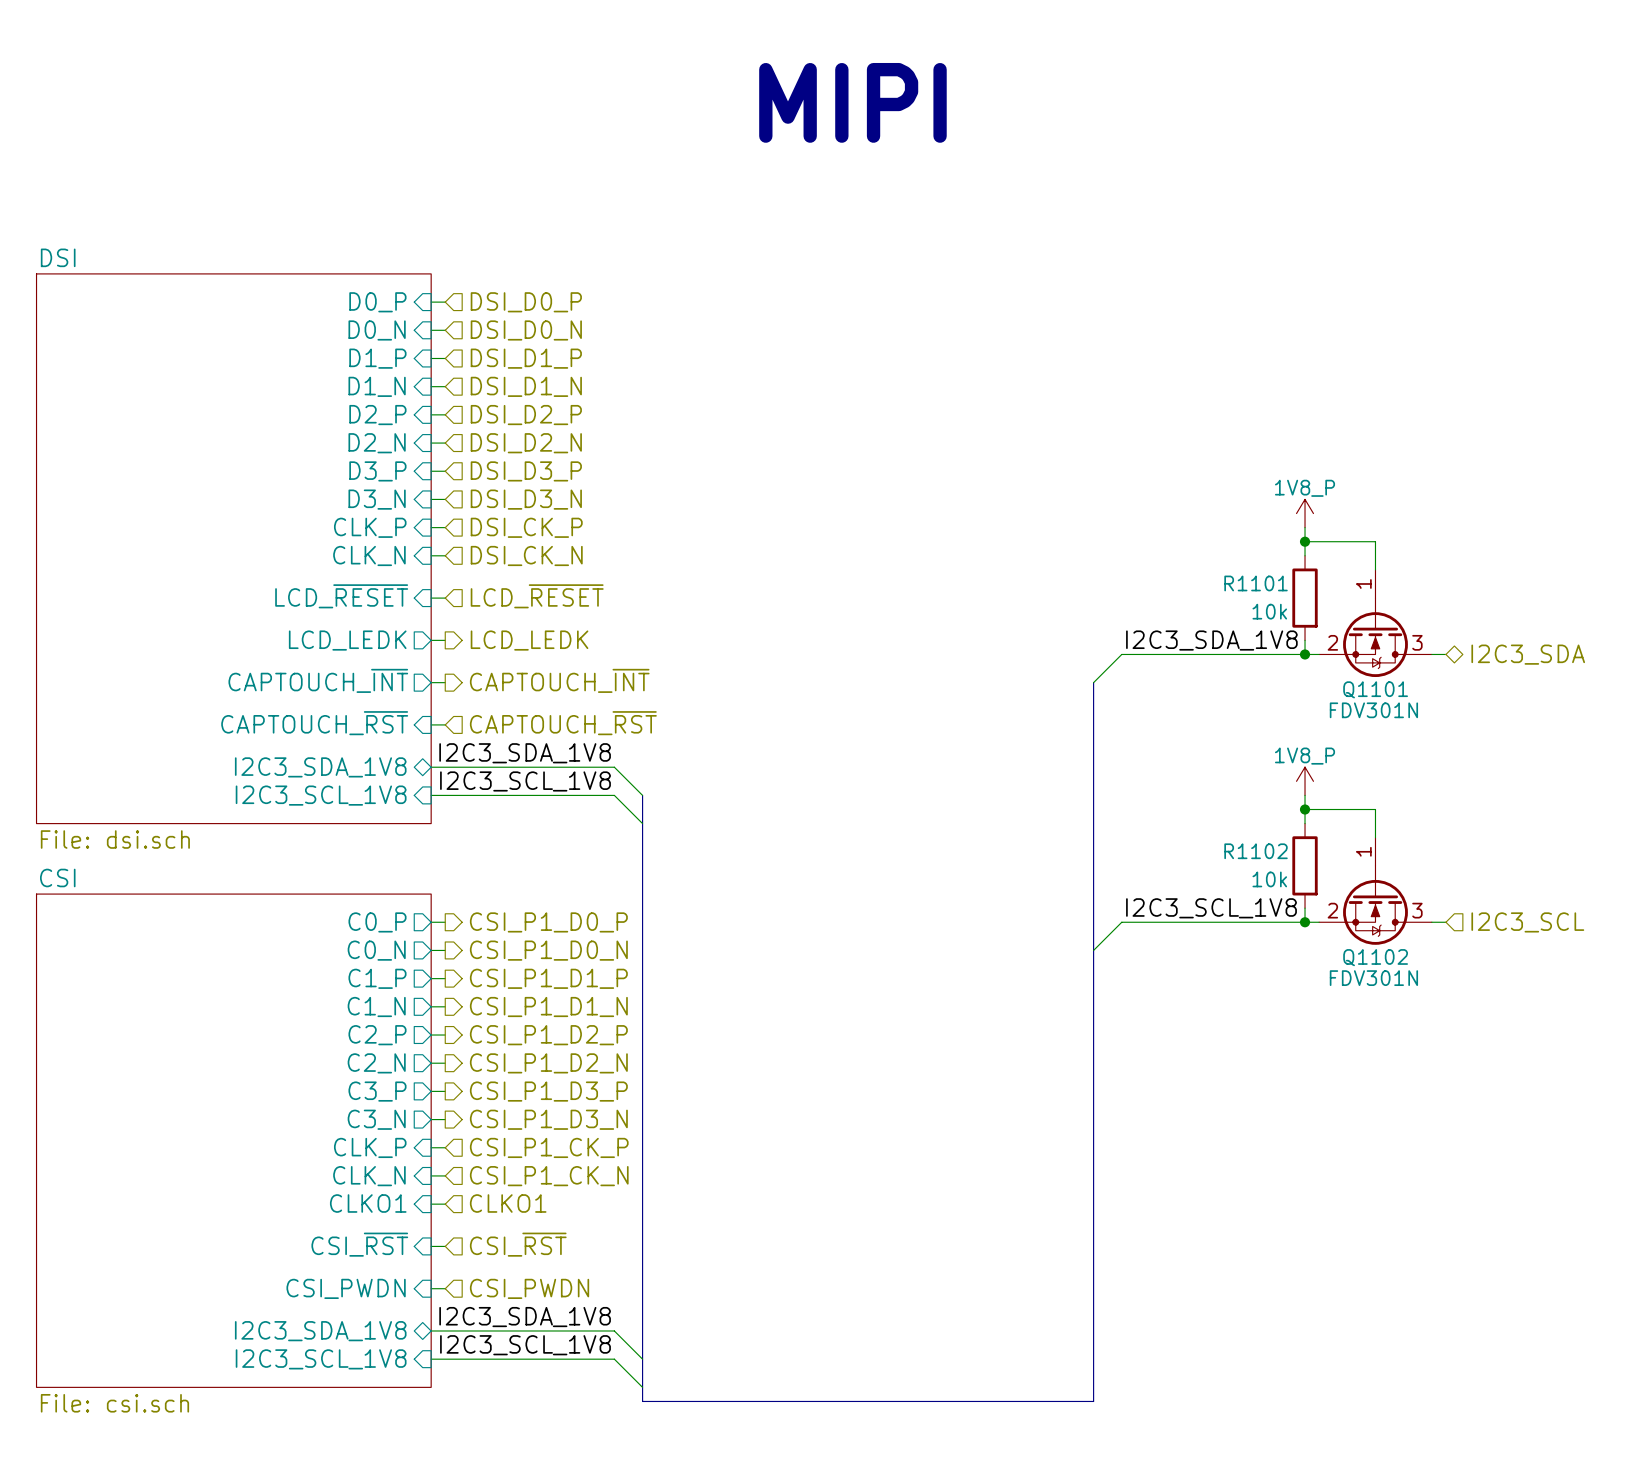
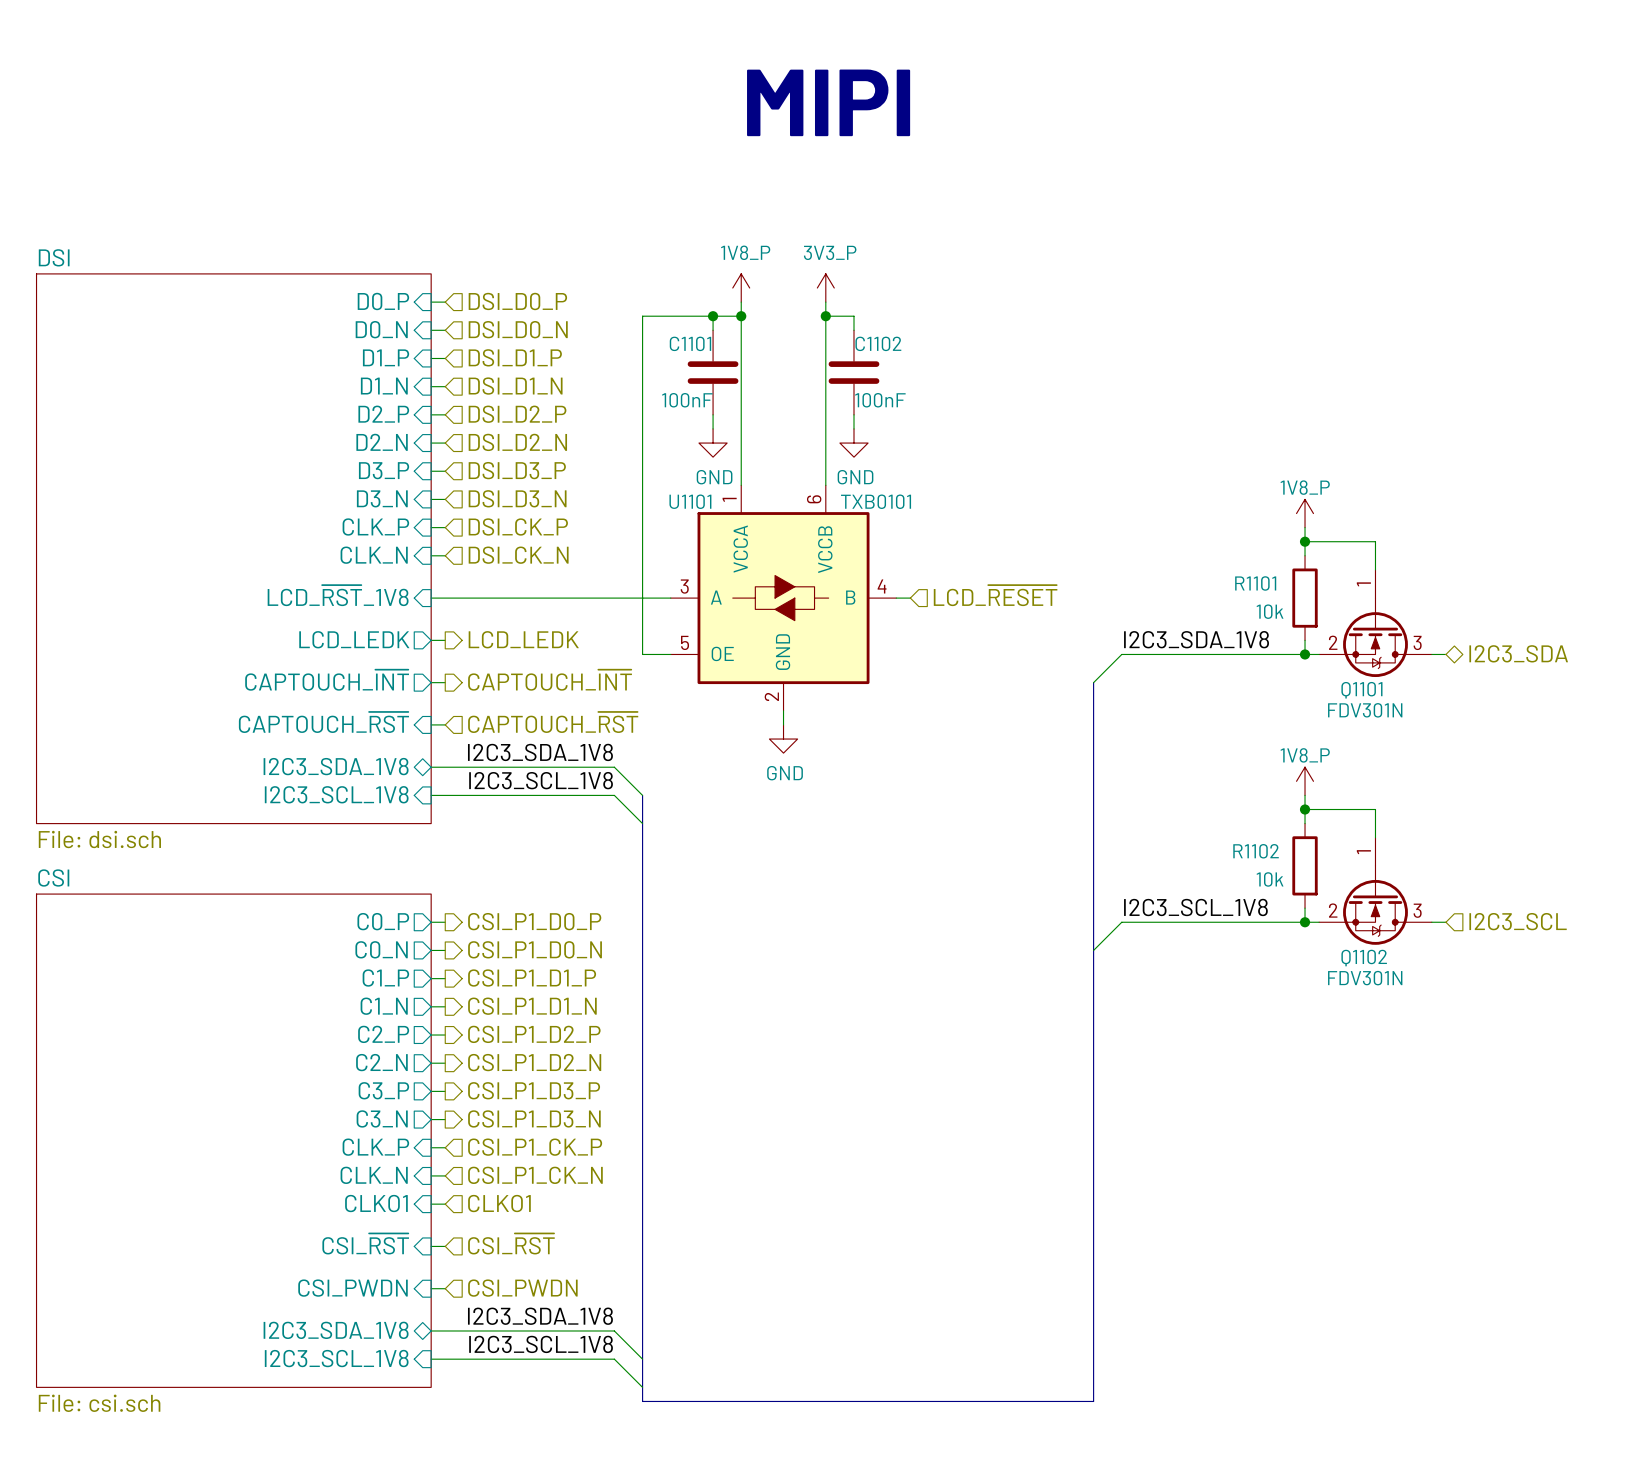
power symbol: none -> 1V8_P (741, 288)
power symbol: none -> 3V3_P (825, 288)
wire: none -> (741, 302) (741, 485)
wire: none -> (825, 302) (825, 485)
wire: none -> (713, 316) (713, 330)
junction: none -> (713, 316)
wire: none -> (741, 316) (642, 316) (642, 654) (670, 654)
junction: none -> (741, 316)
wire: none -> (825, 316) (853, 316) (853, 330)
junction: none -> (825, 316)
C1101: none -> 100nF (713, 372)
C1102: none -> 100nF (853, 372)
wire: none -> (713, 414) (713, 428)
wire: none -> (853, 414) (853, 428)
power symbol: none -> GND (713, 443)
power symbol: none -> GND (853, 443)
sheet pin: LCD_~{RESET} (341, 596) -> LCD_~{RST}_1V8 (338, 595)
hierarchical label: LCD_~{RESET} (537, 596) -> none
hierarchical label: none -> LCD_~{RESET} (995, 595)
wire: none -> (445, 598) (670, 598)
U1101: none -> TXB0101 (783, 598)
wire: none -> (896, 598) (910, 598)
wire: none -> (783, 710) (783, 724)
power symbol: none -> GND (783, 739)

